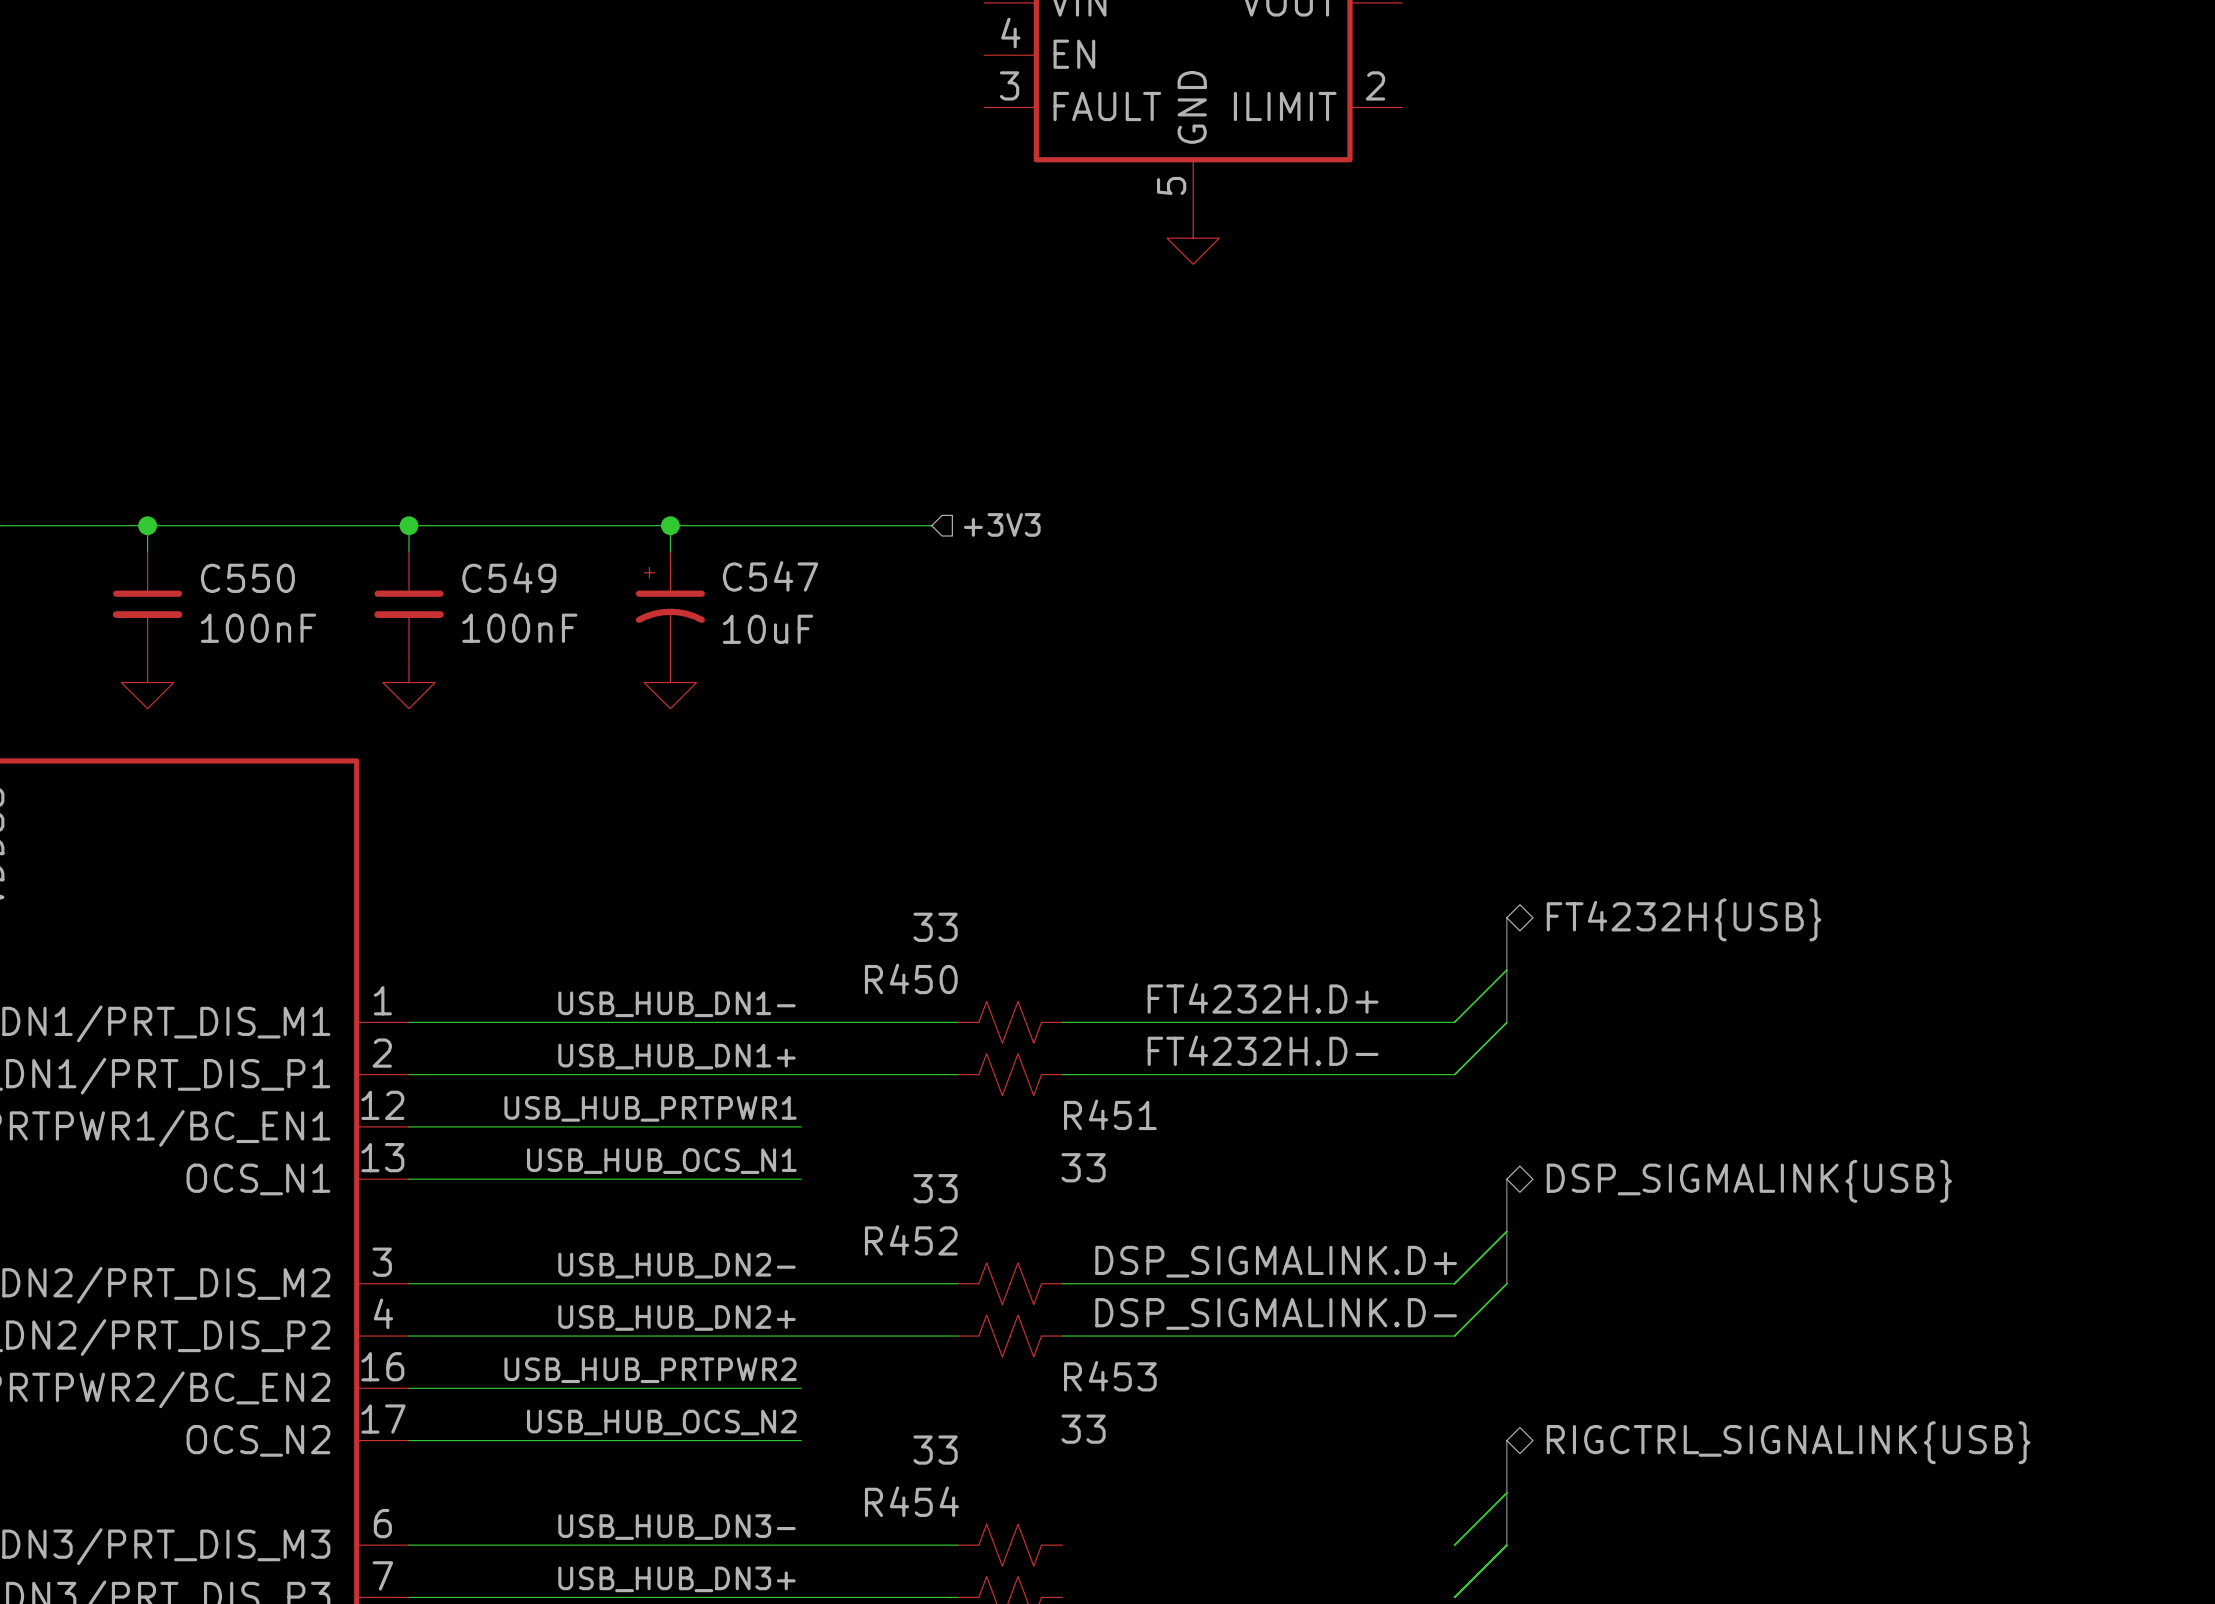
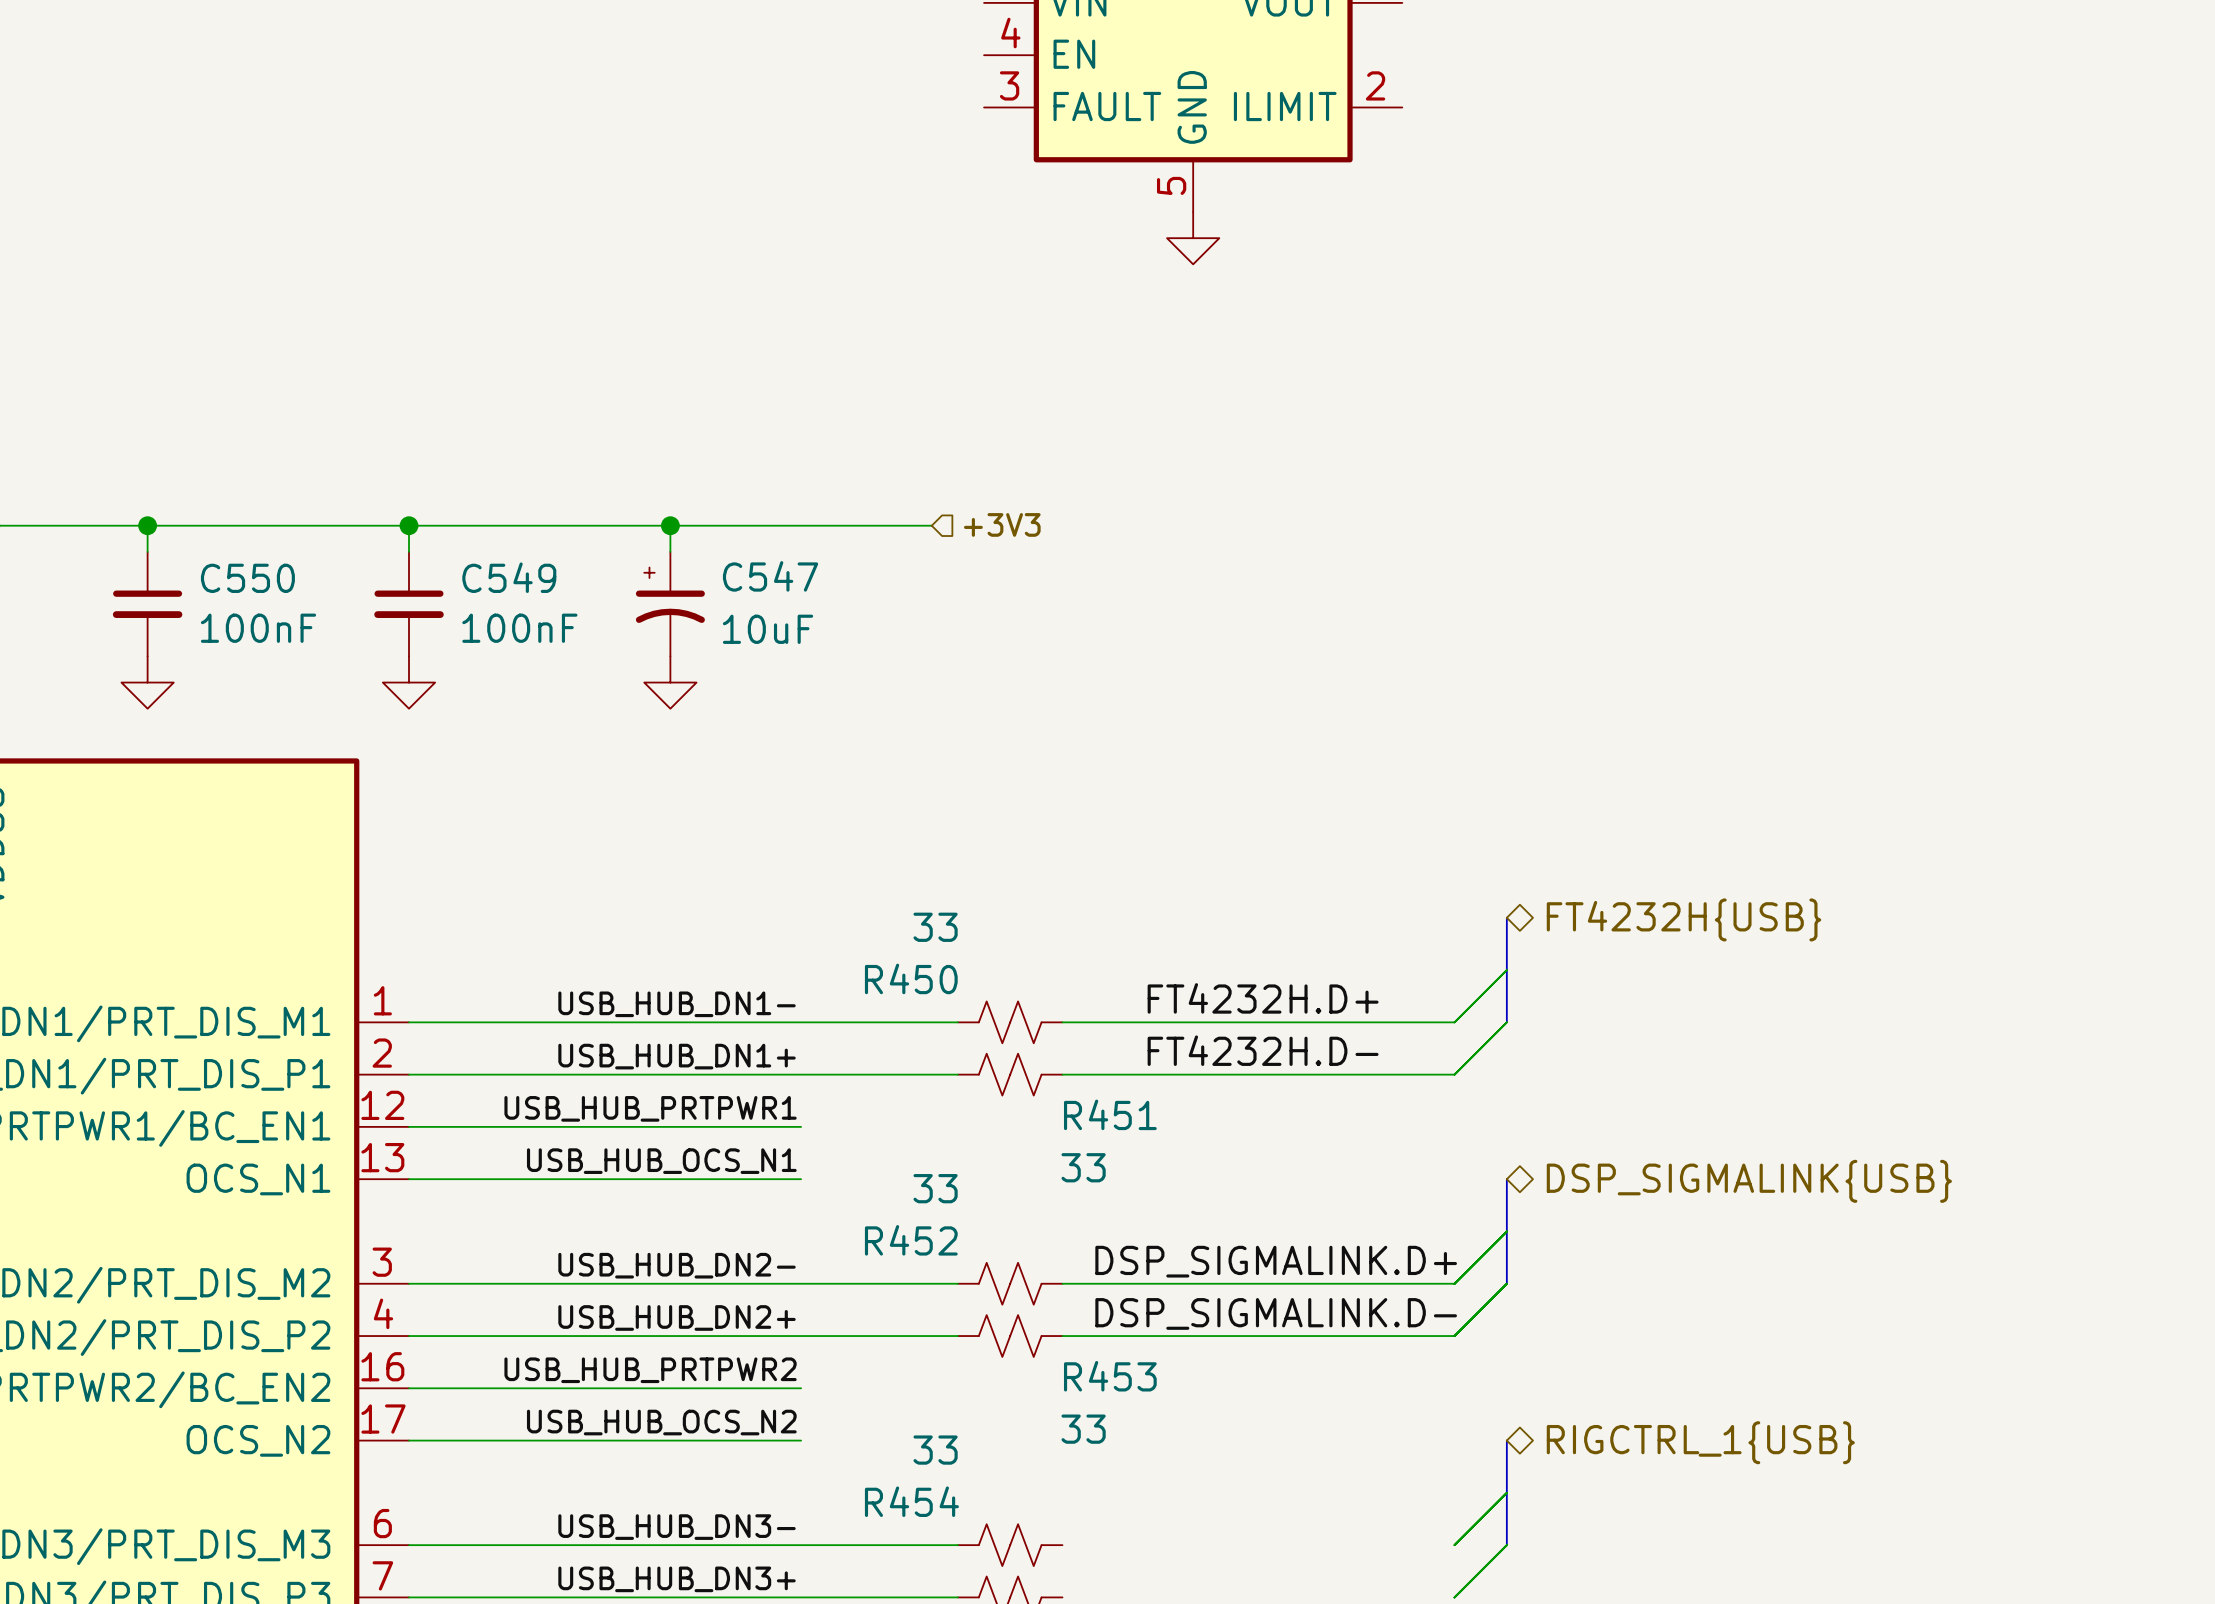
hierarchical label: RIGCTRL_SIGNALINK{USB} (1788, 1442) -> RIGCTRL_1{USB} (1700, 1442)

